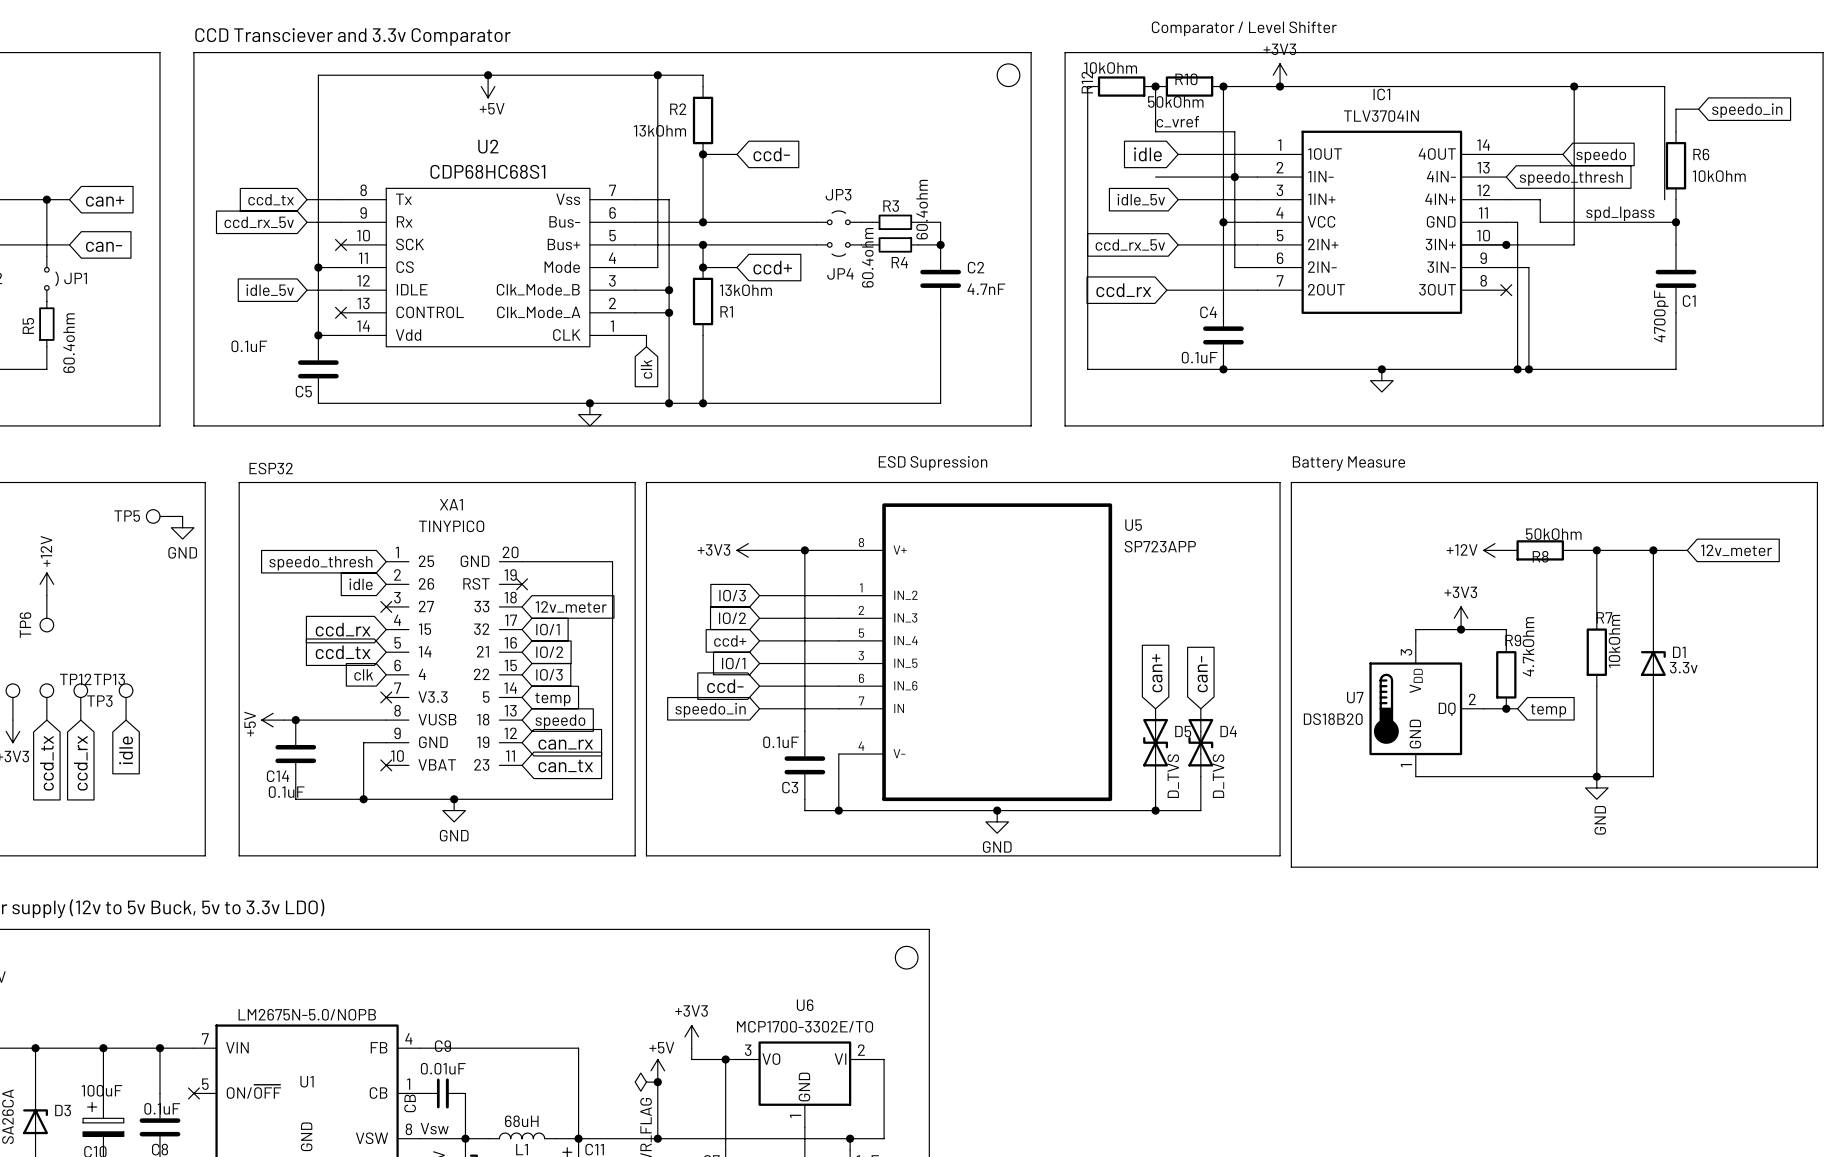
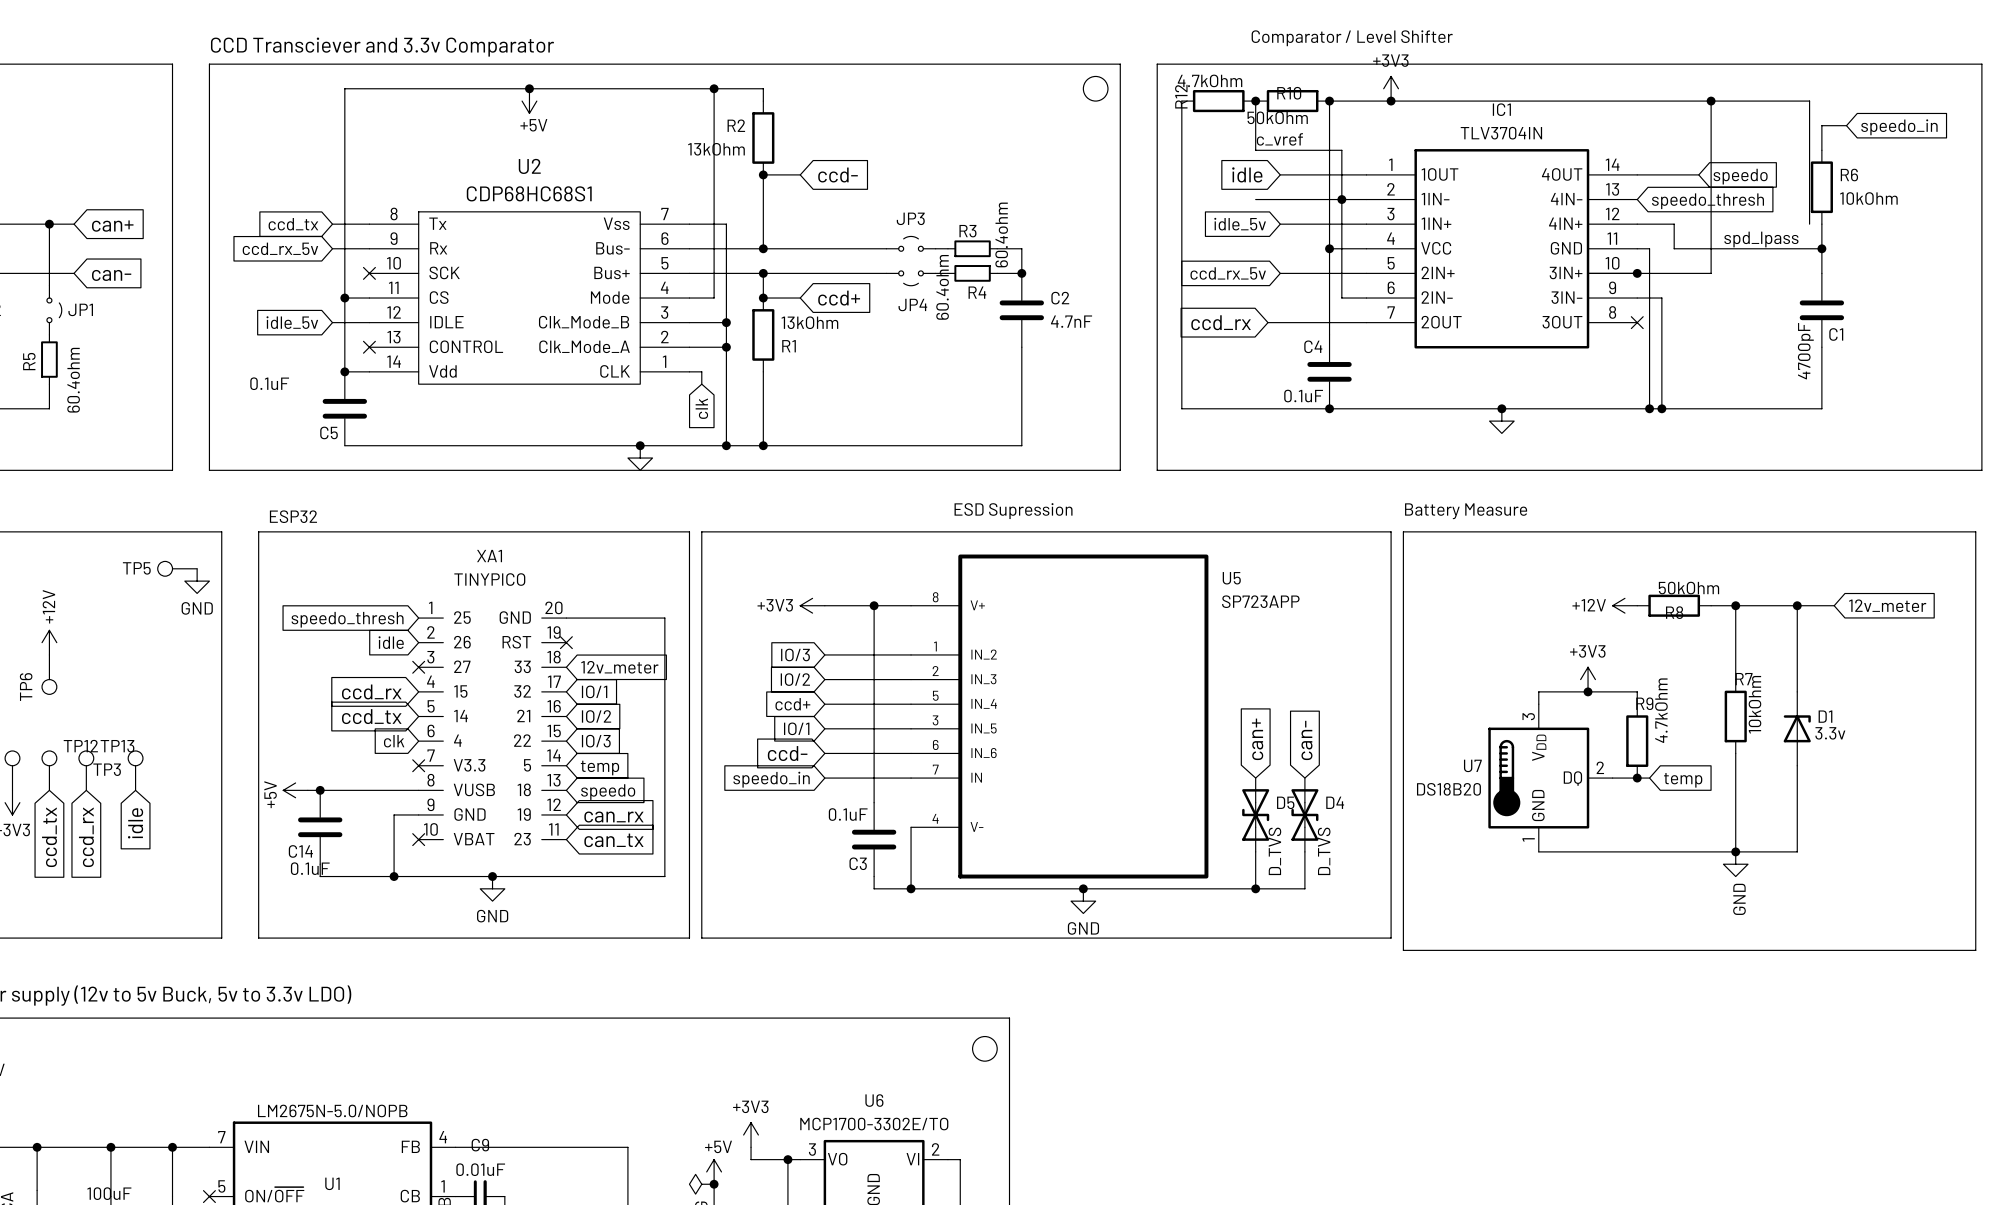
R12 value: 10kOhm (1110, 68) -> 4.7kOhm (1210, 80)

